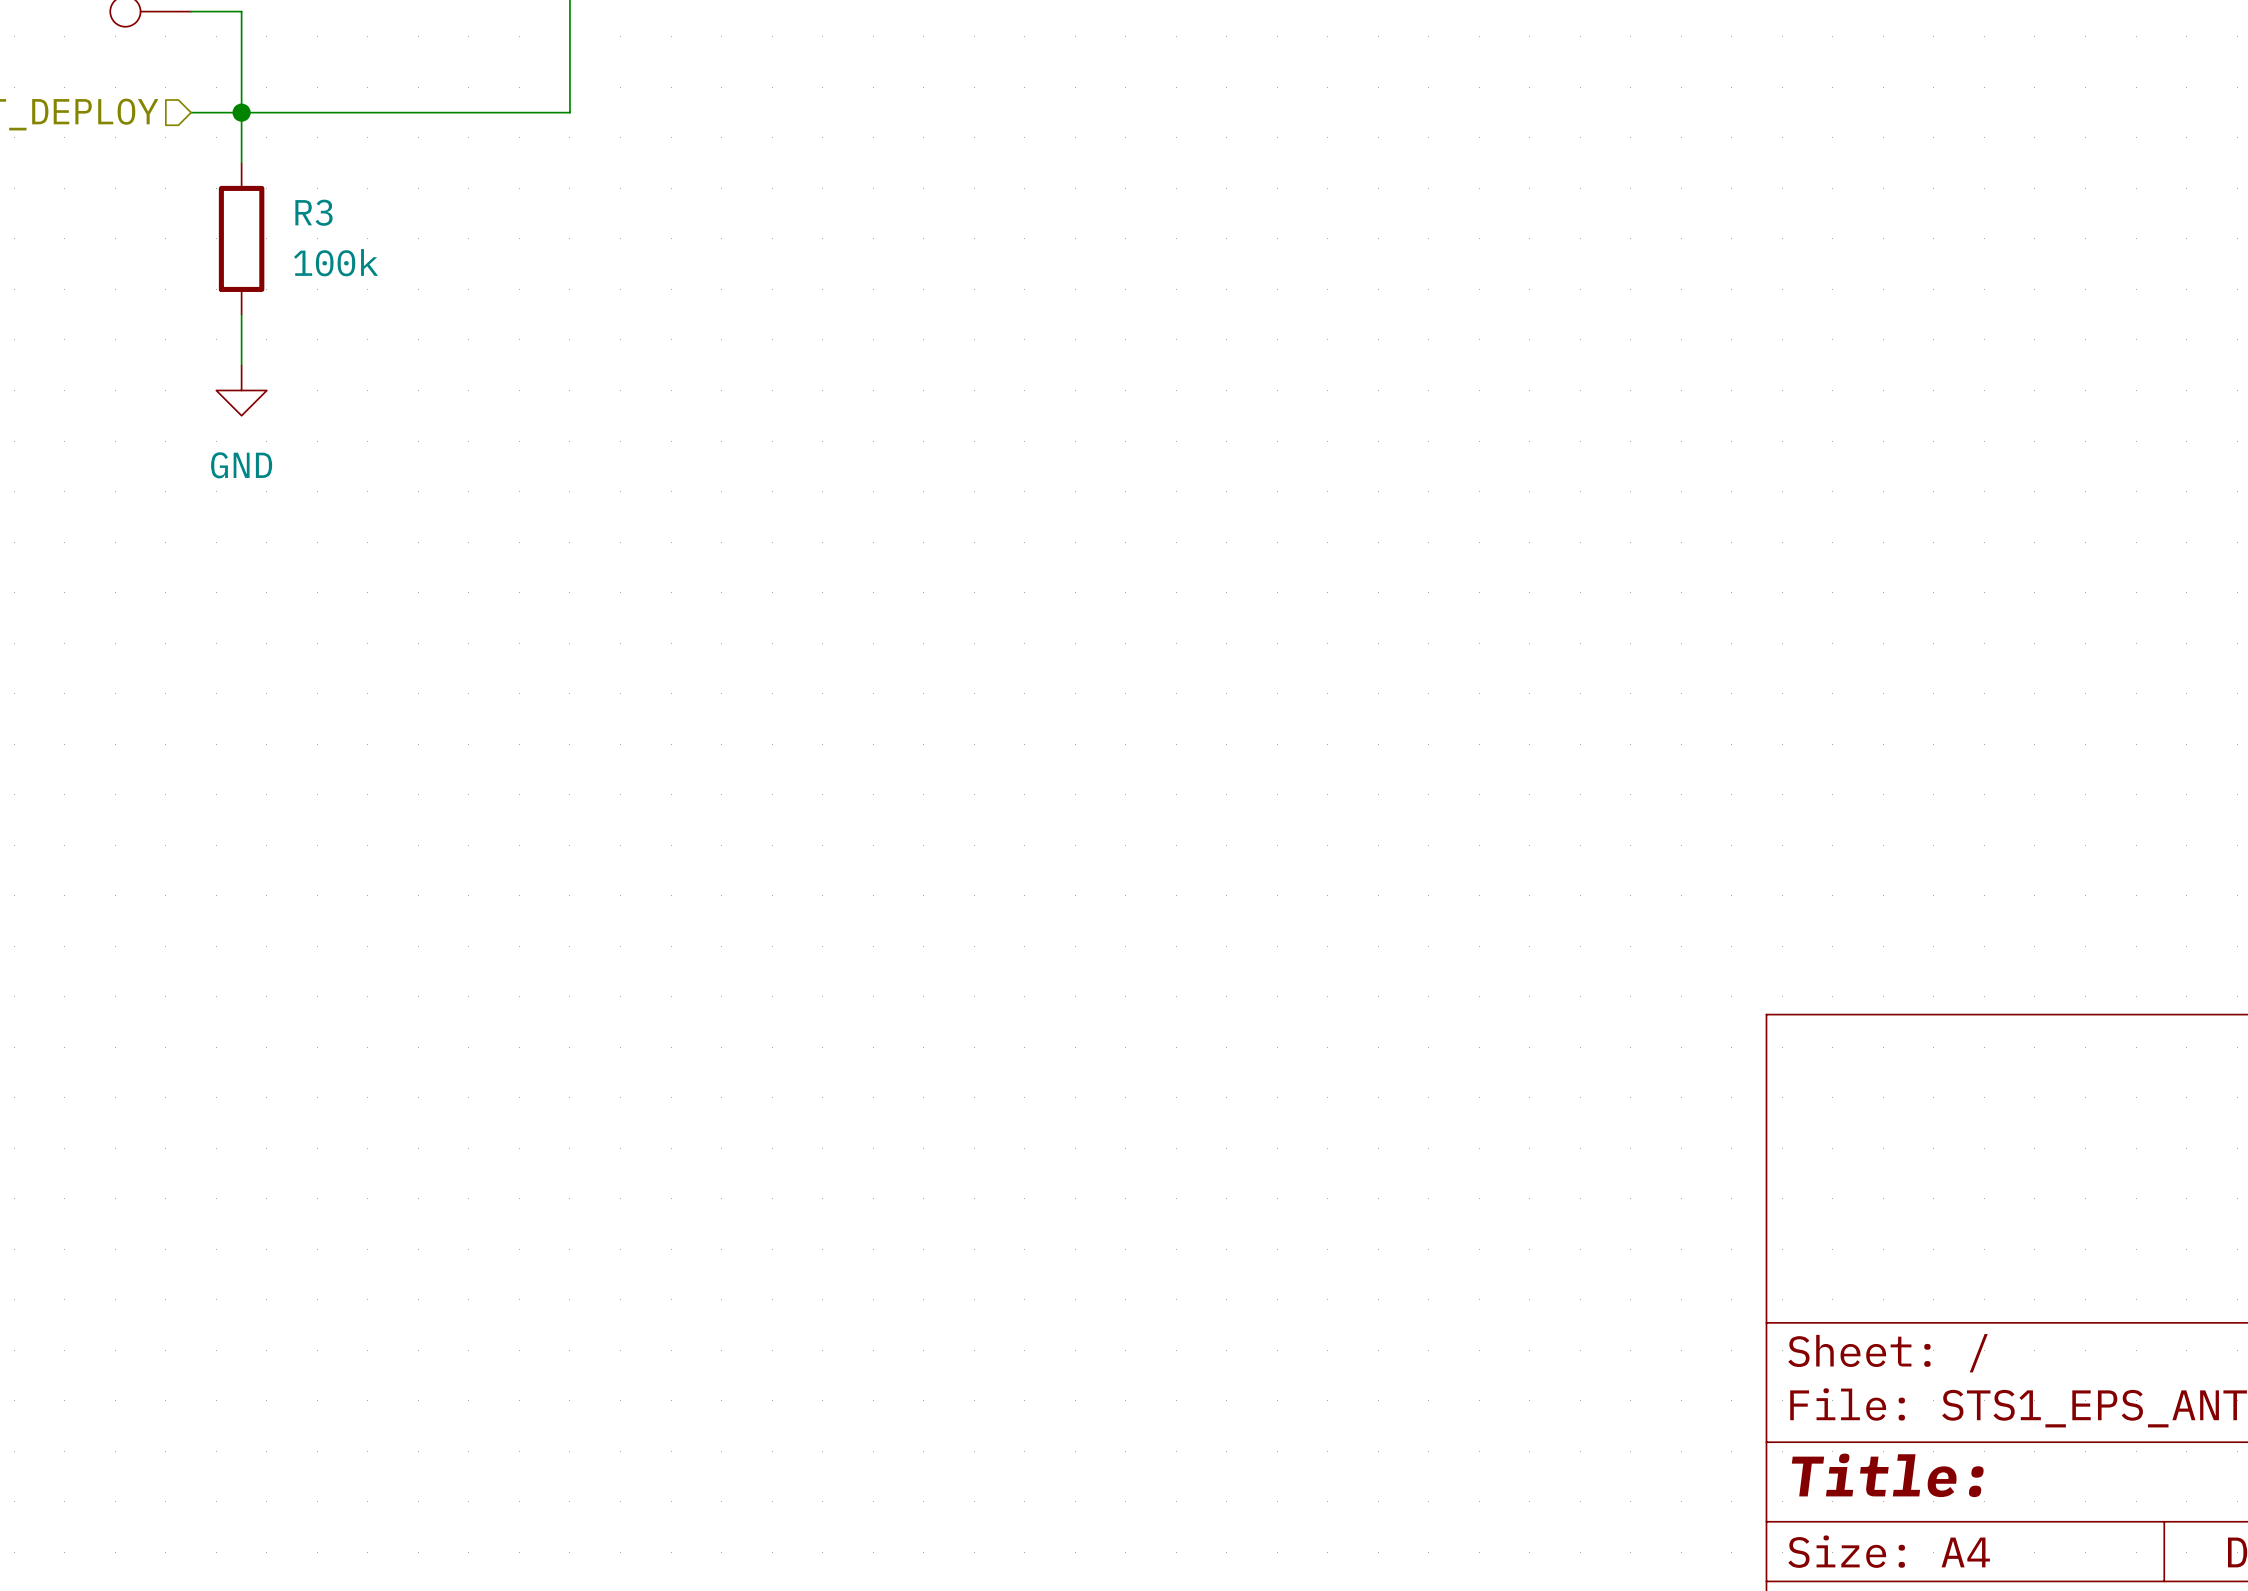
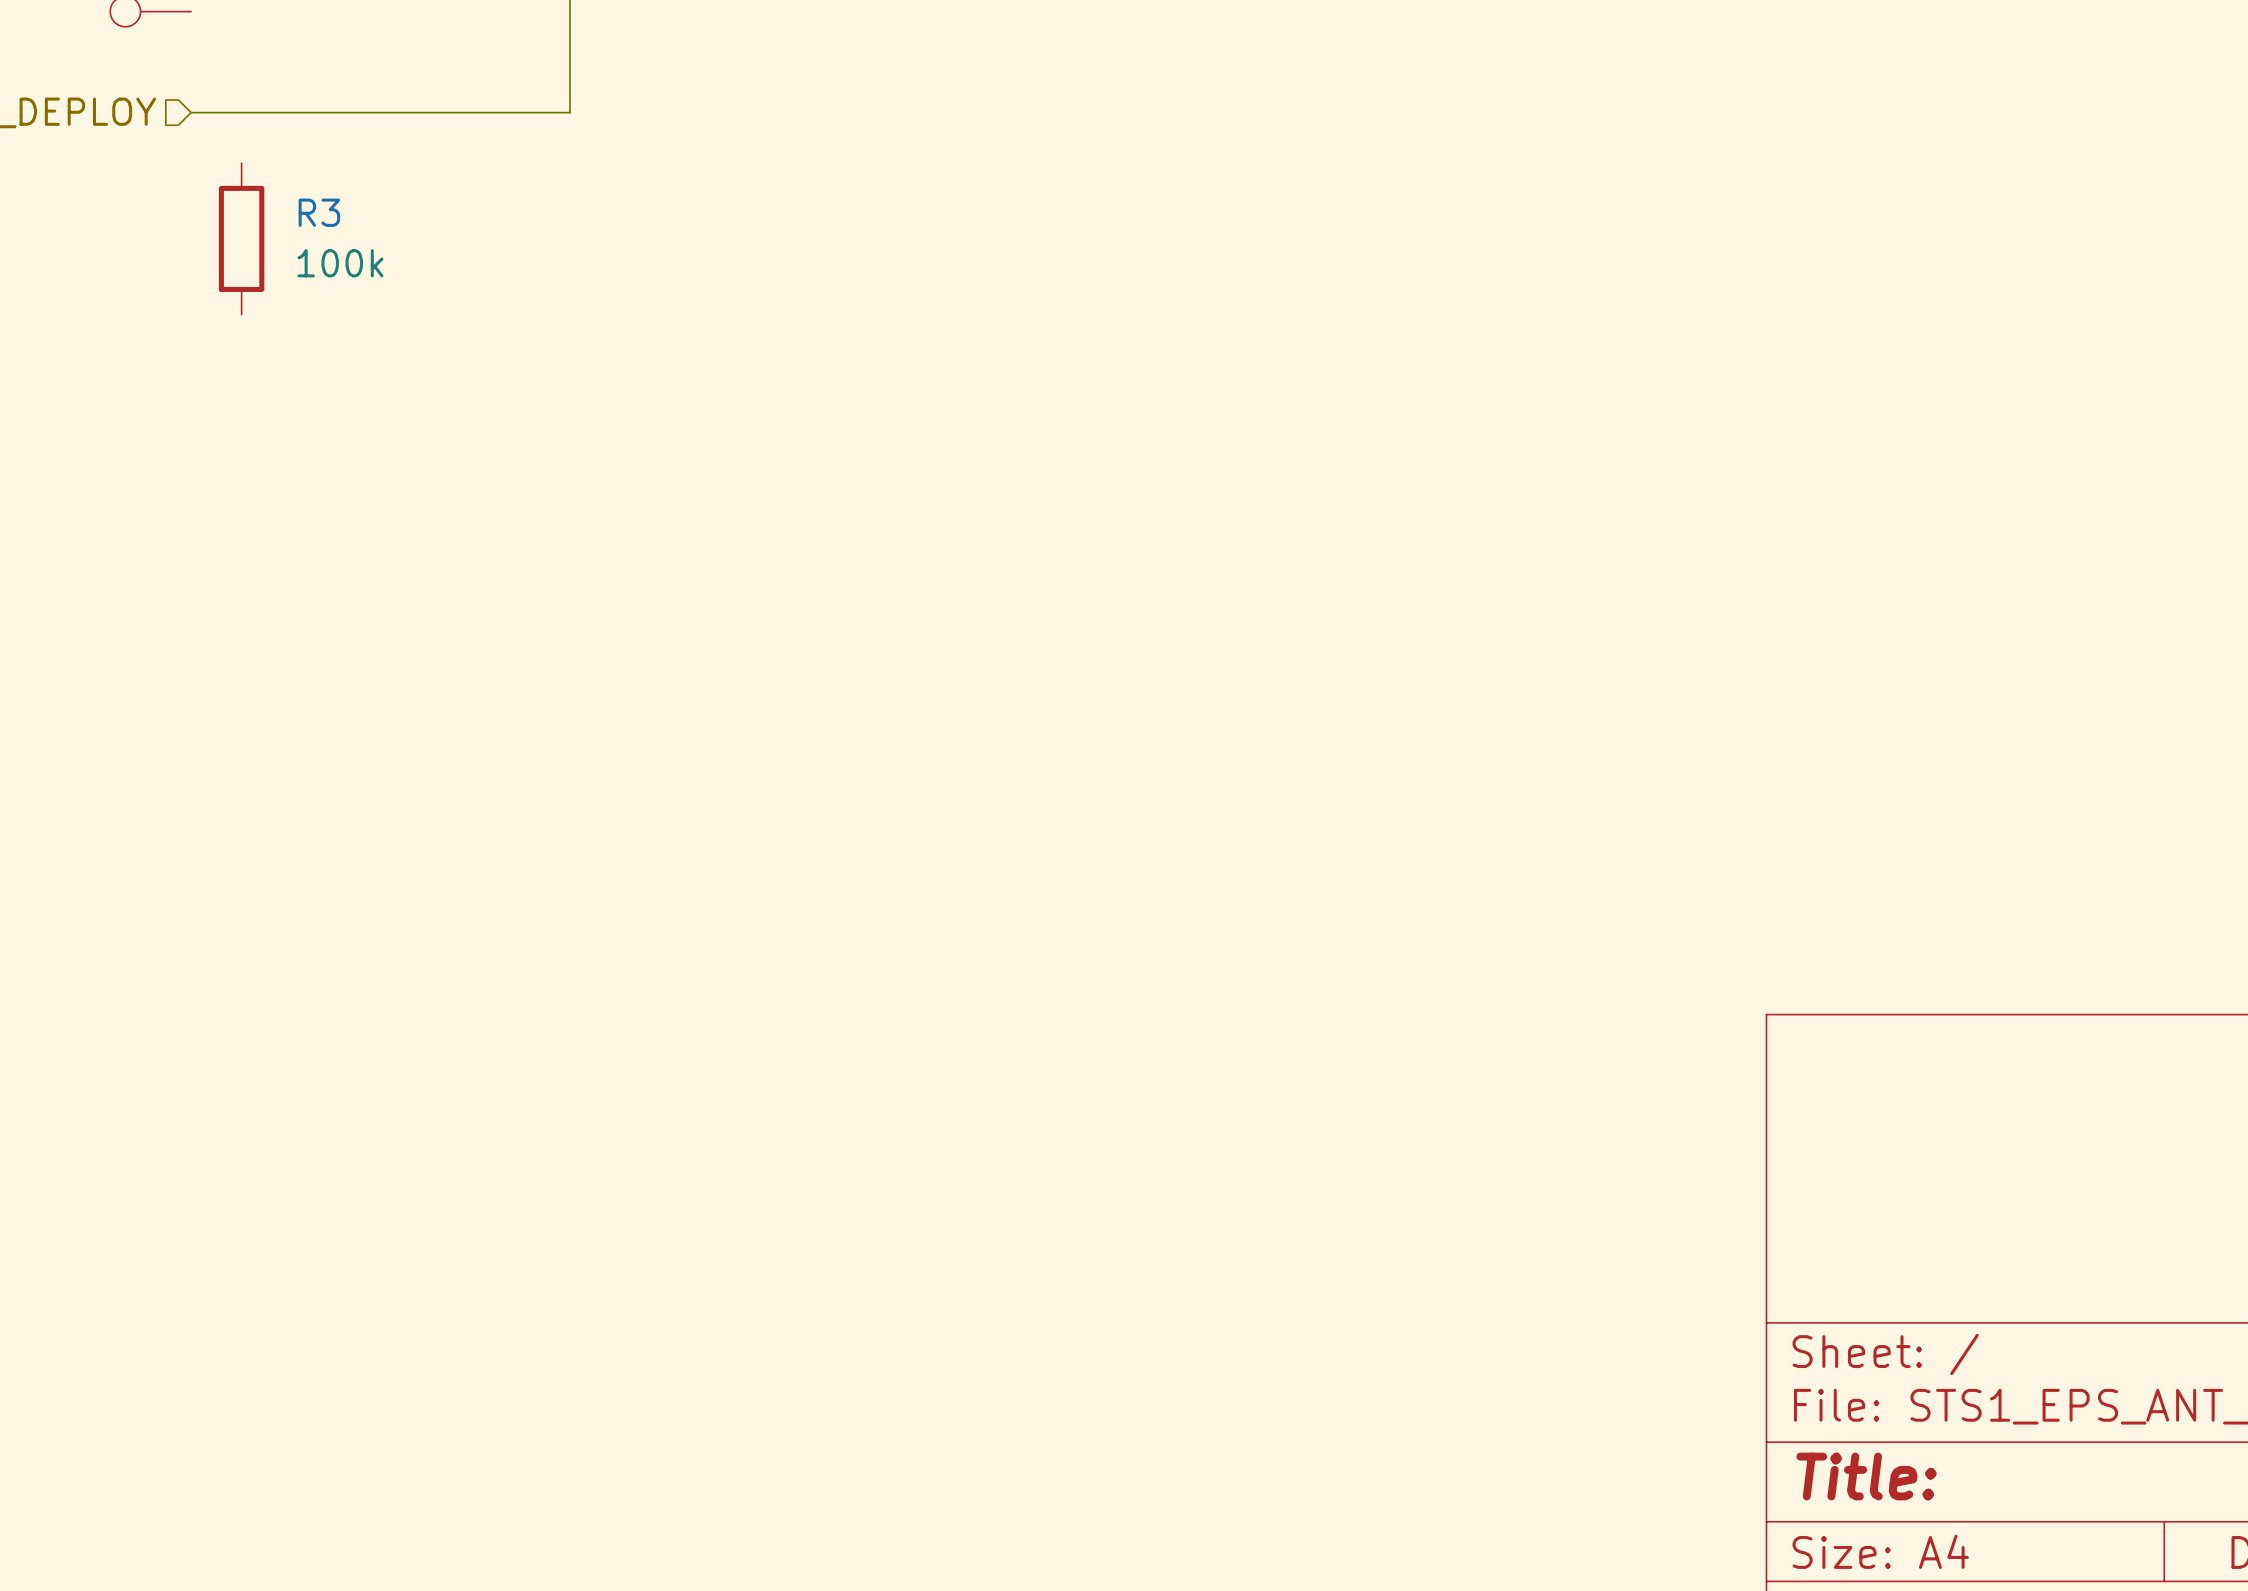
wire: (191, 11) (241, 11) (241, 163) -> none
junction: (241, 112) -> none
wire: (241, 314) (241, 365) -> none
power symbol: GND (241, 390) -> none

